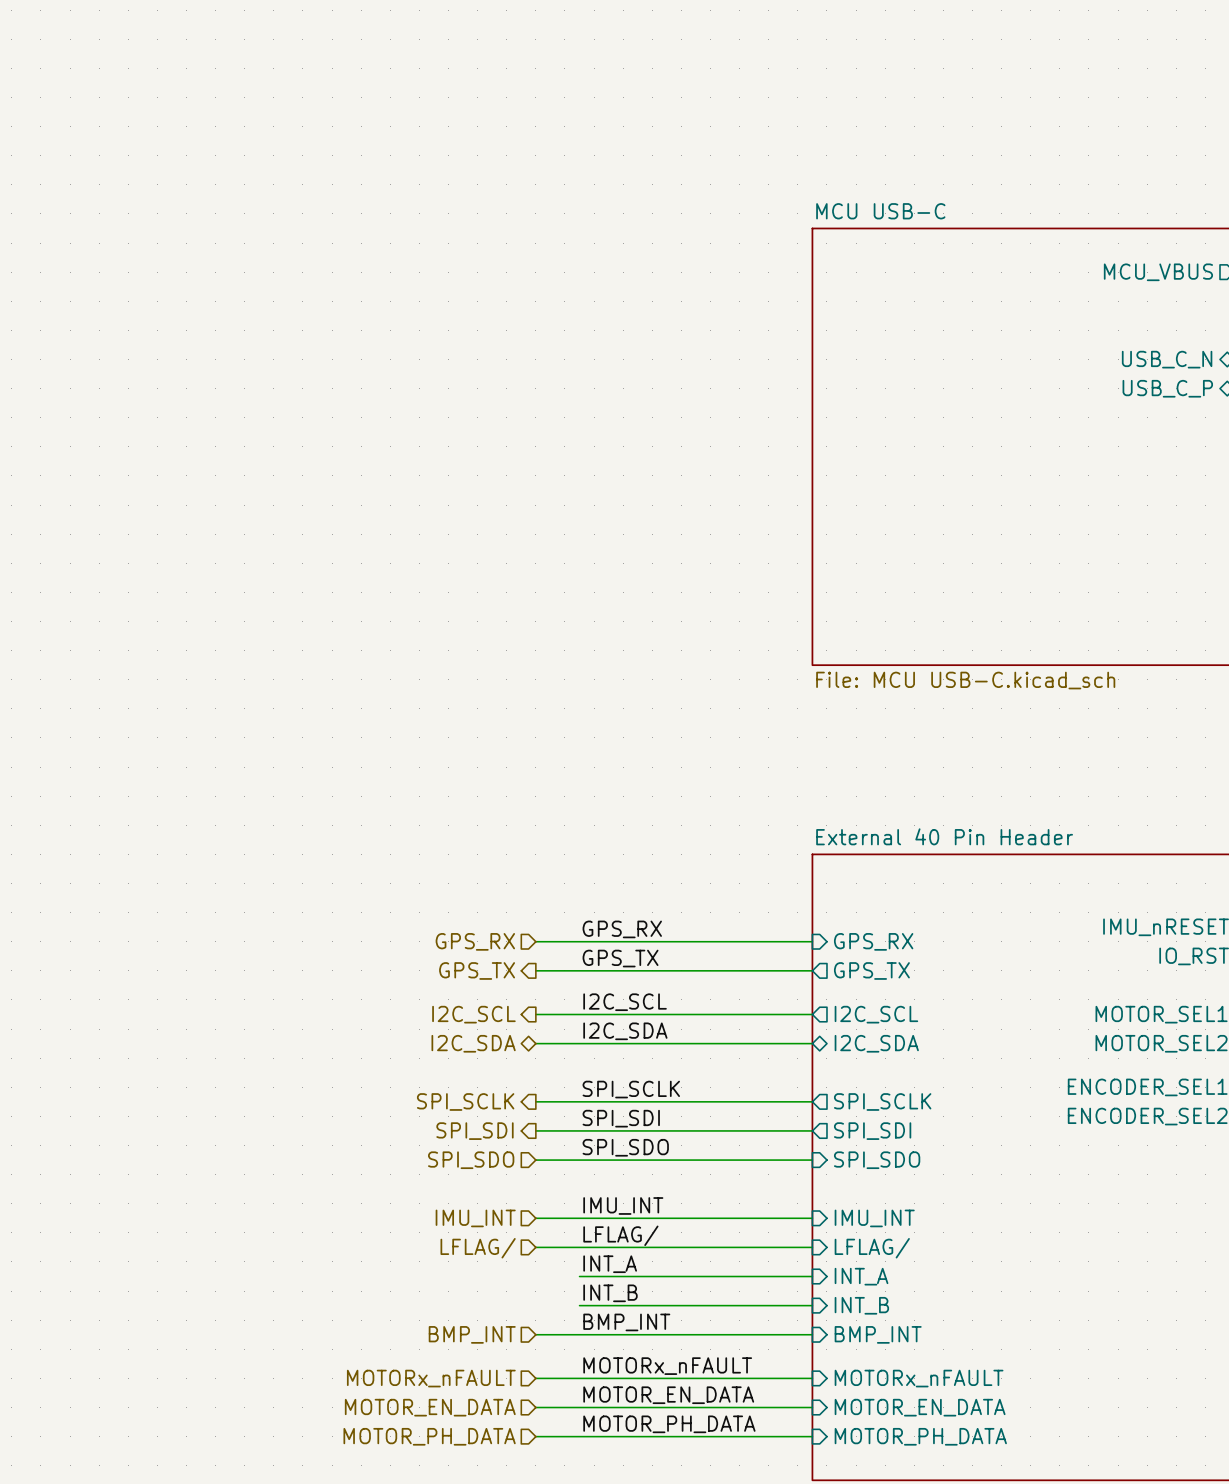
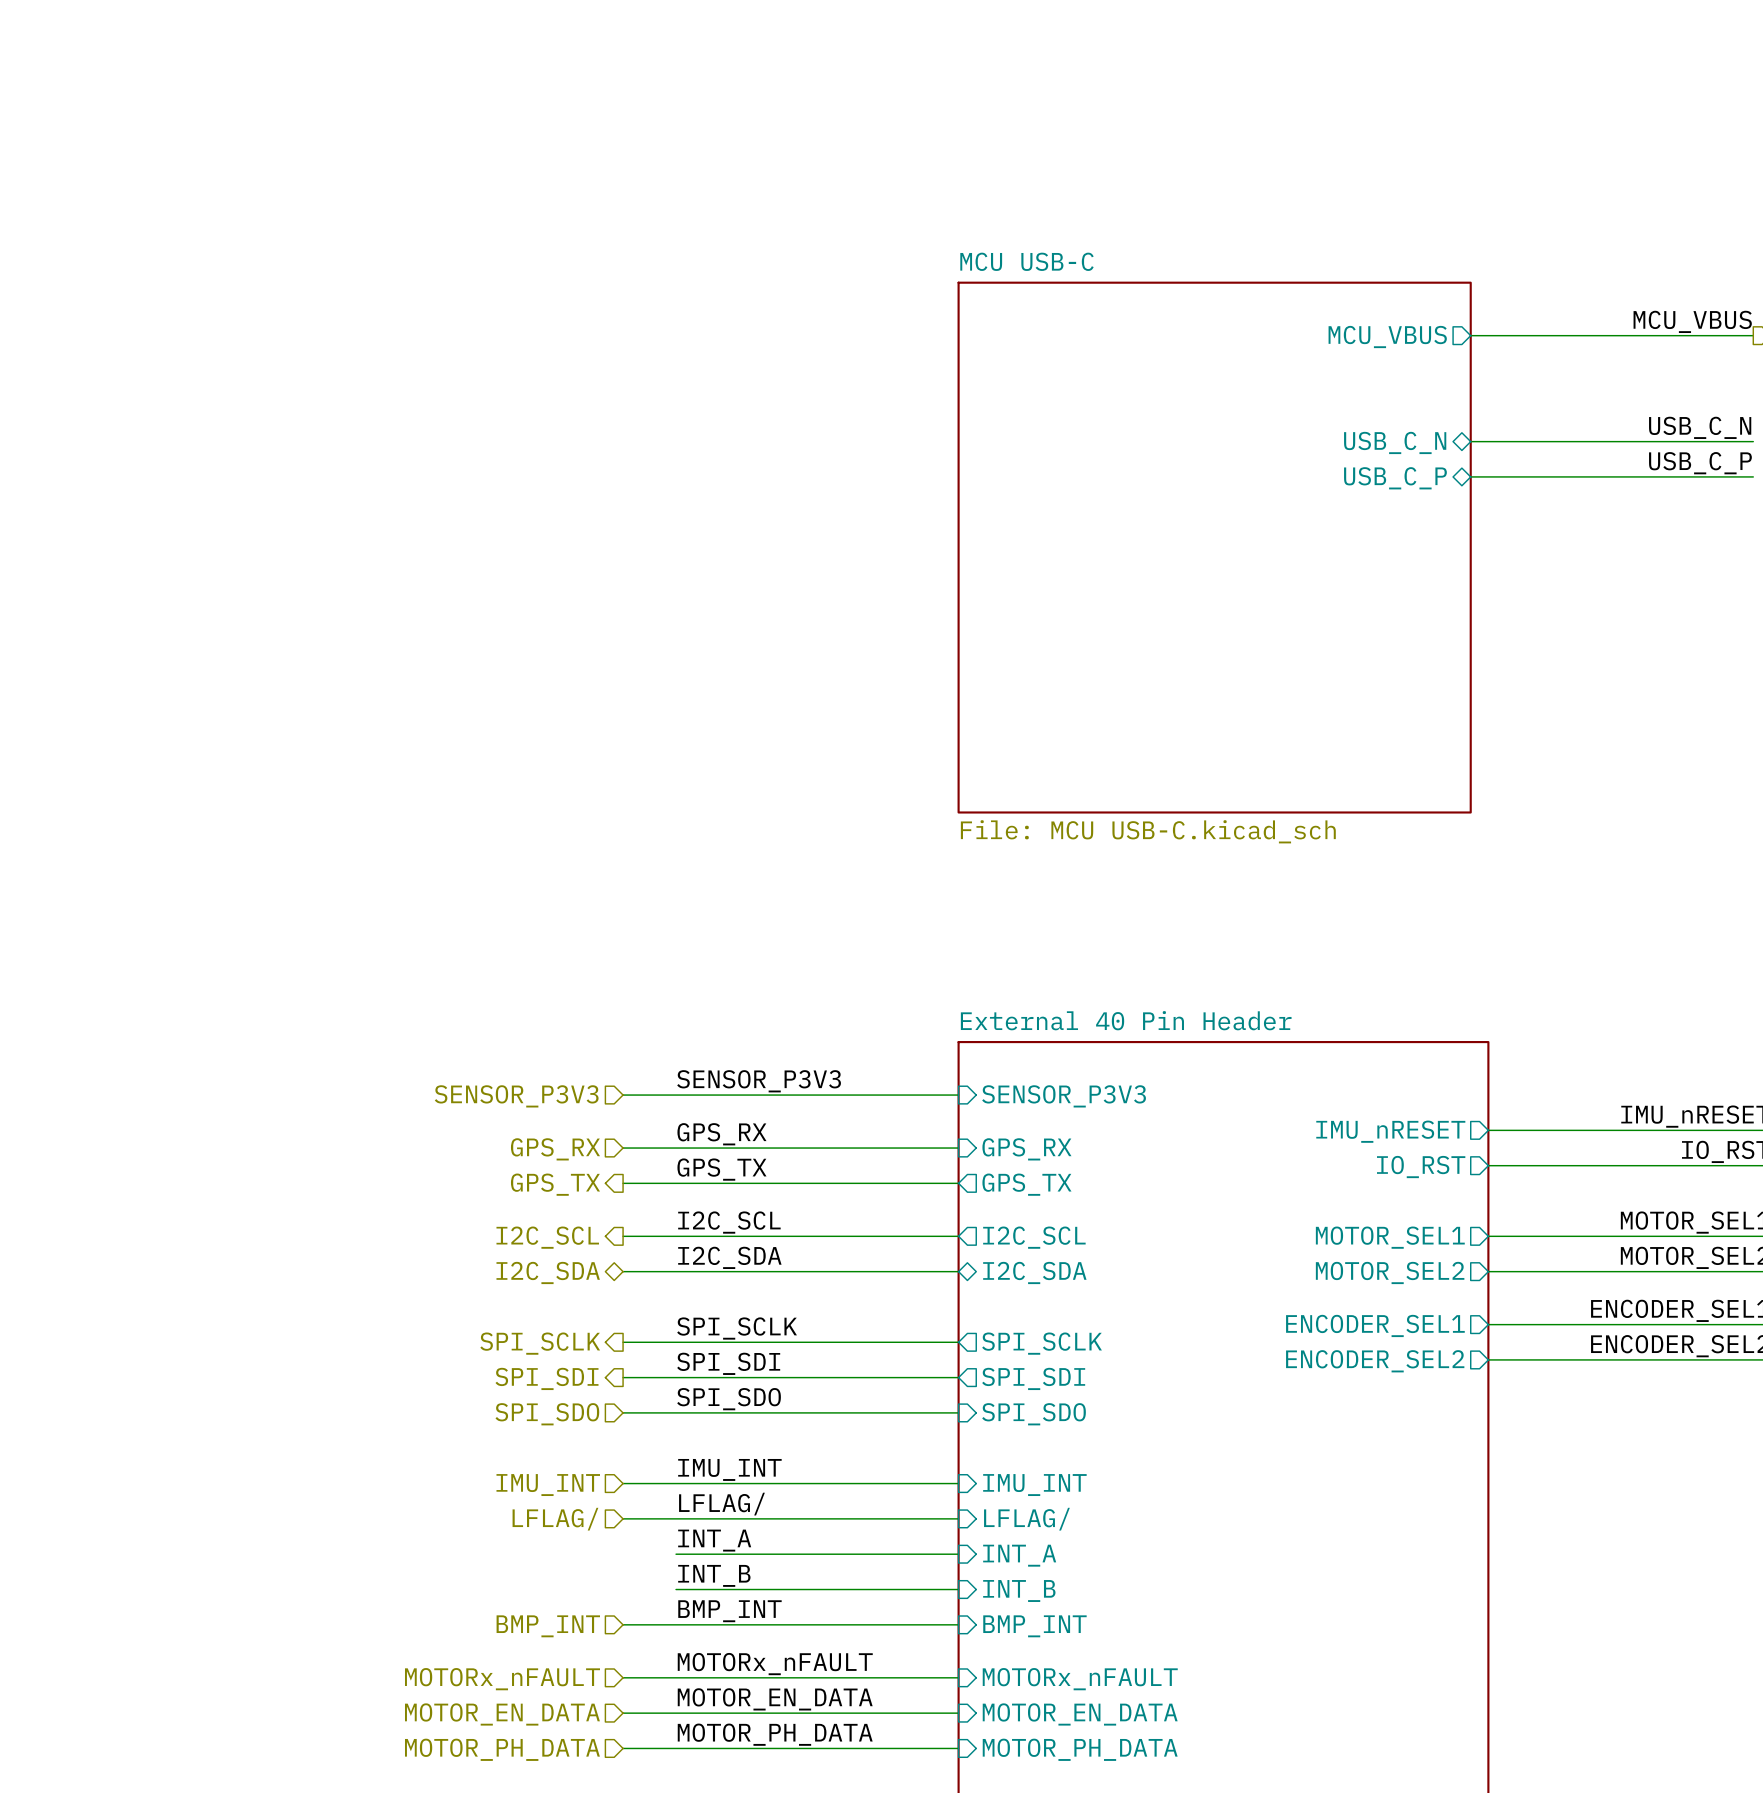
label: none -> SENSOR_P3V3 (759, 1081)
hierarchical label: none -> SENSOR_P3V3 (516, 1096)
wire: none -> (623, 1095) (958, 1095)
sheet pin: none -> SENSOR_P3V3 (1064, 1096)

